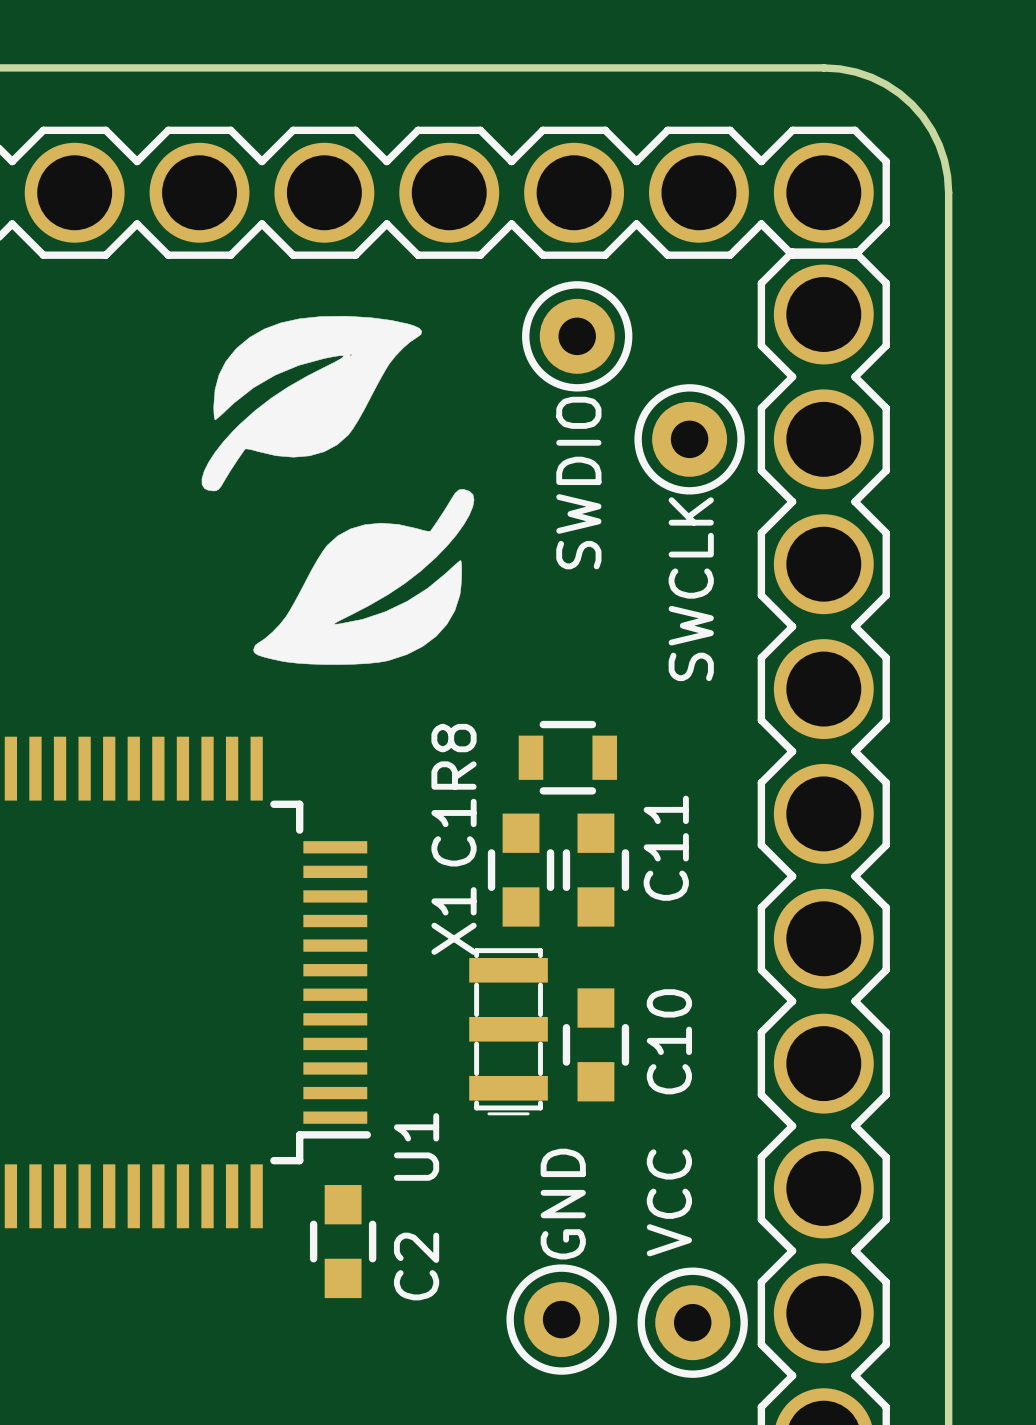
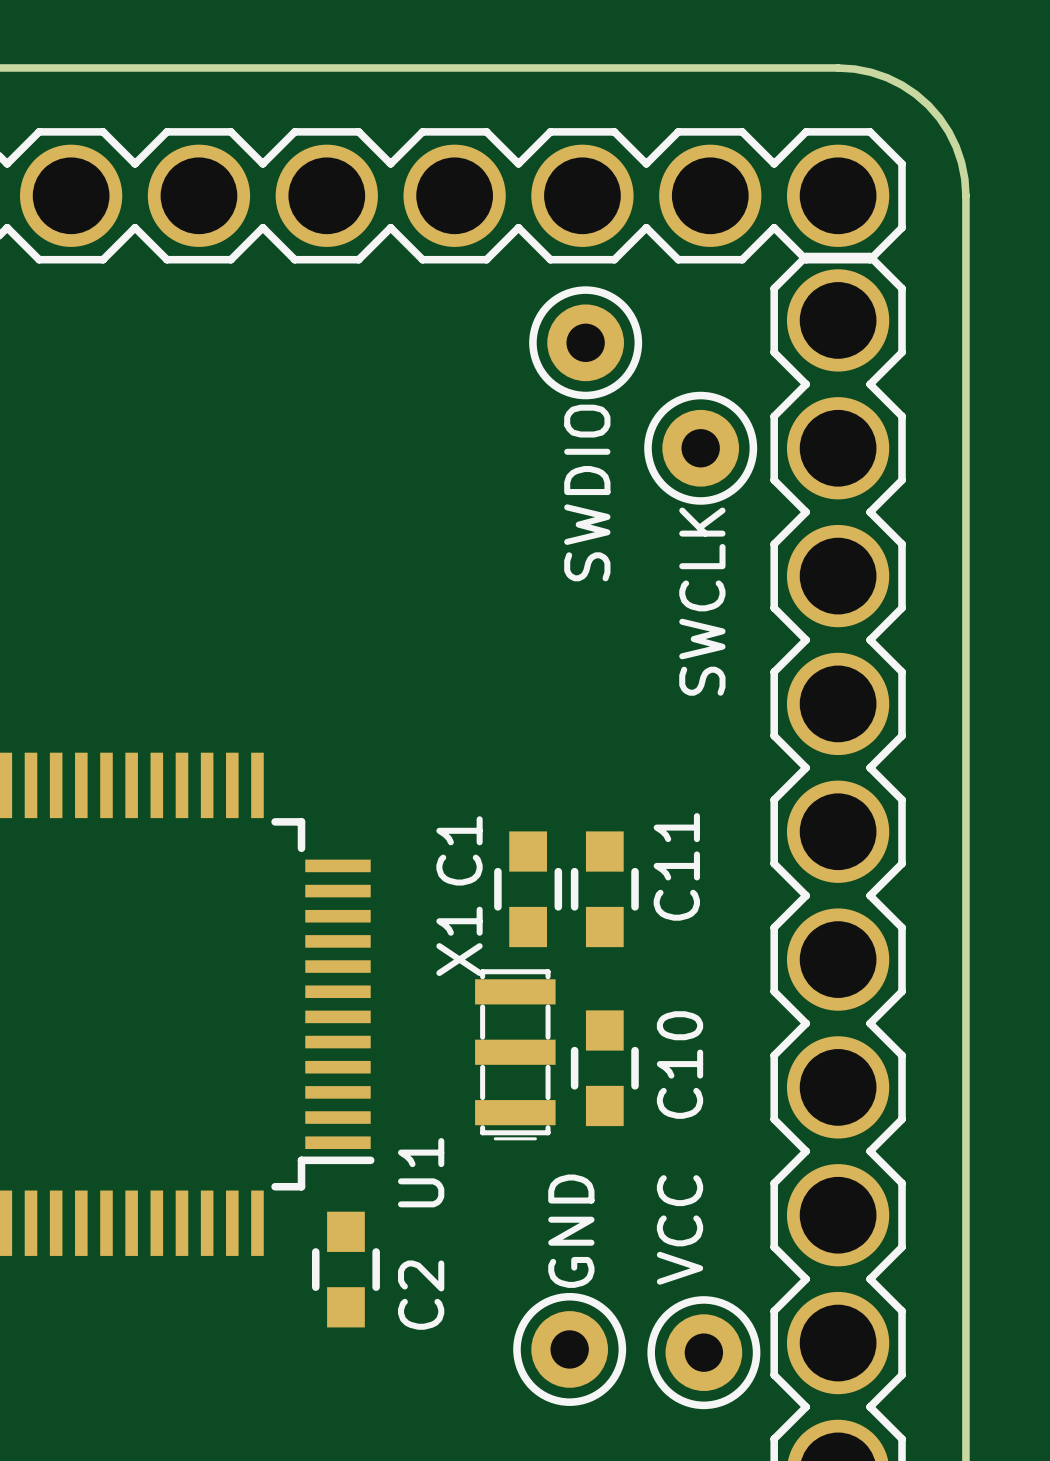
drawing: [201, 315, 475, 665] -> none
R8: (567, 757) -> none

